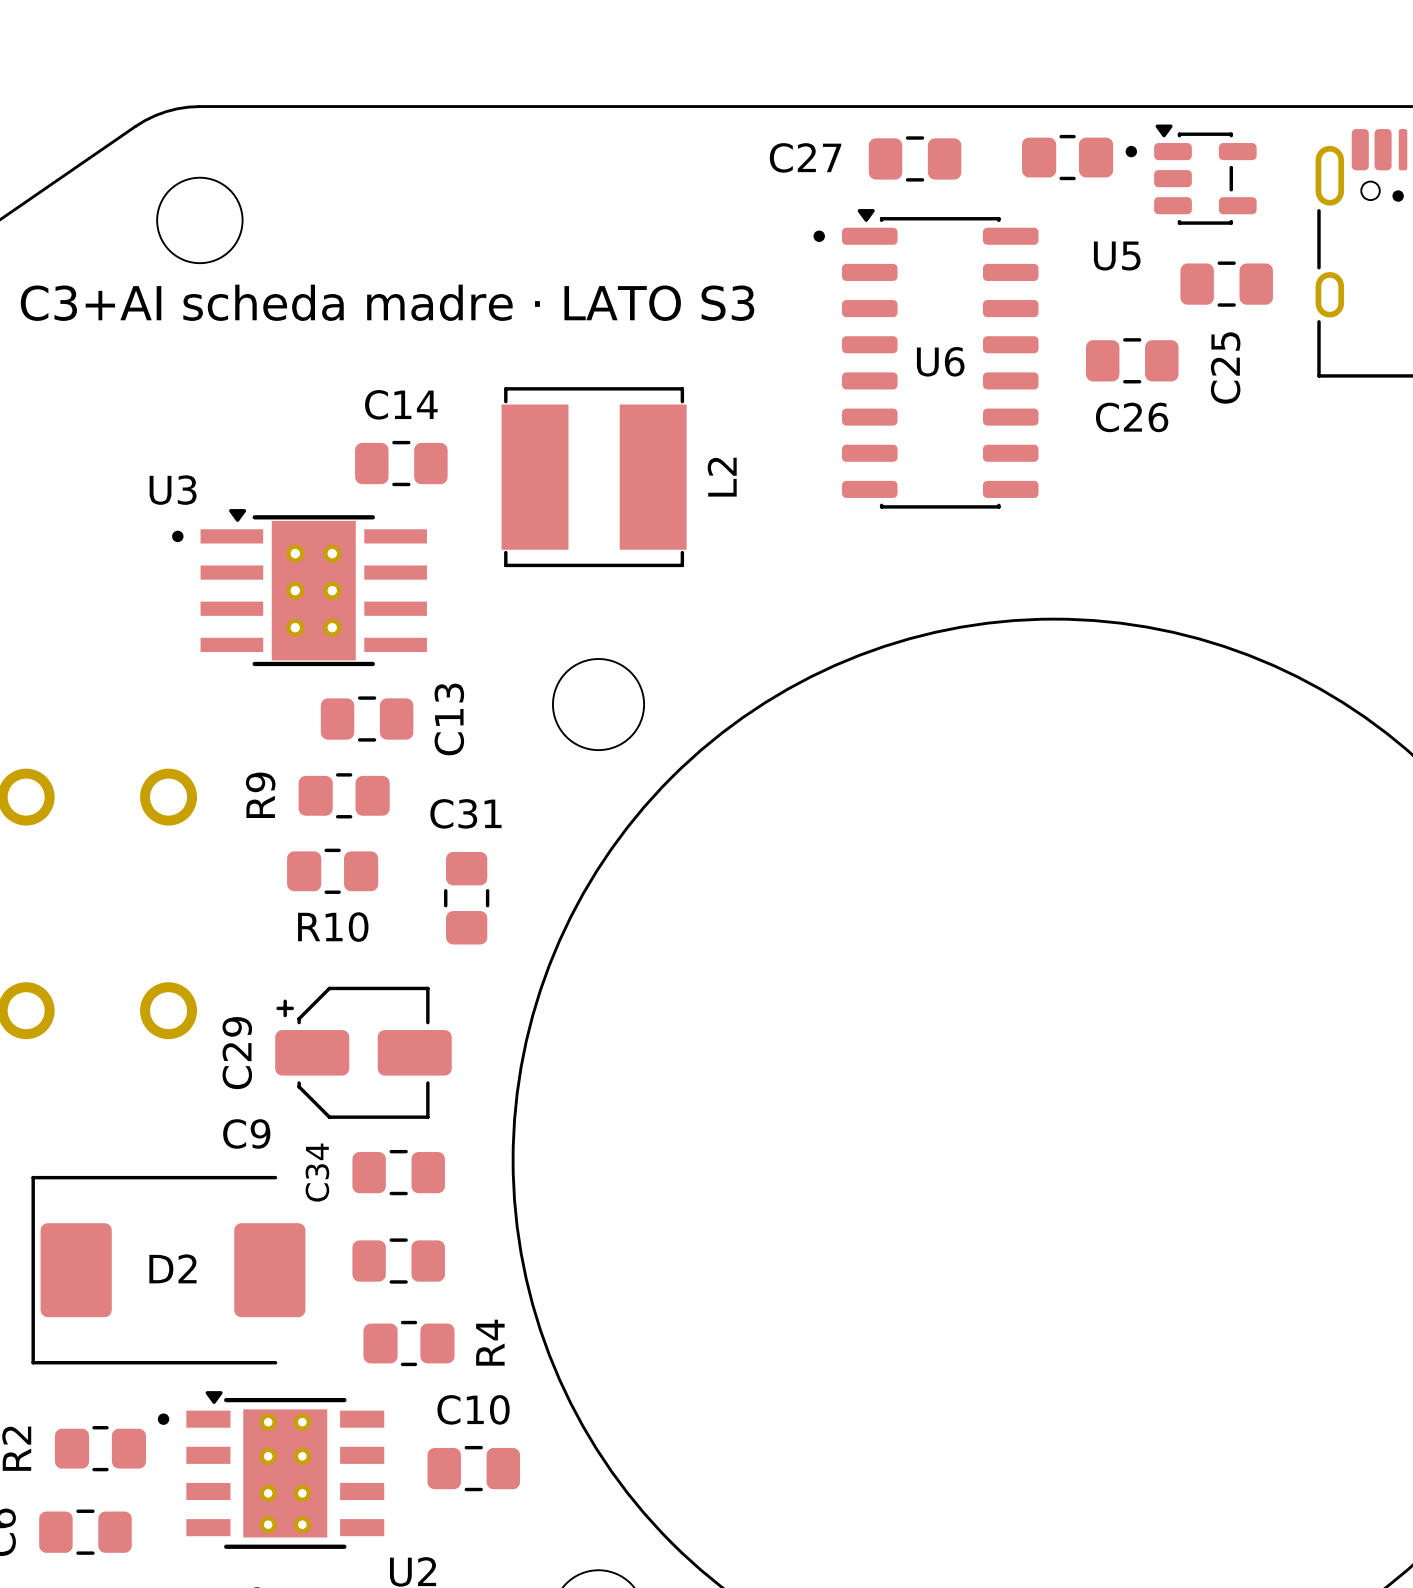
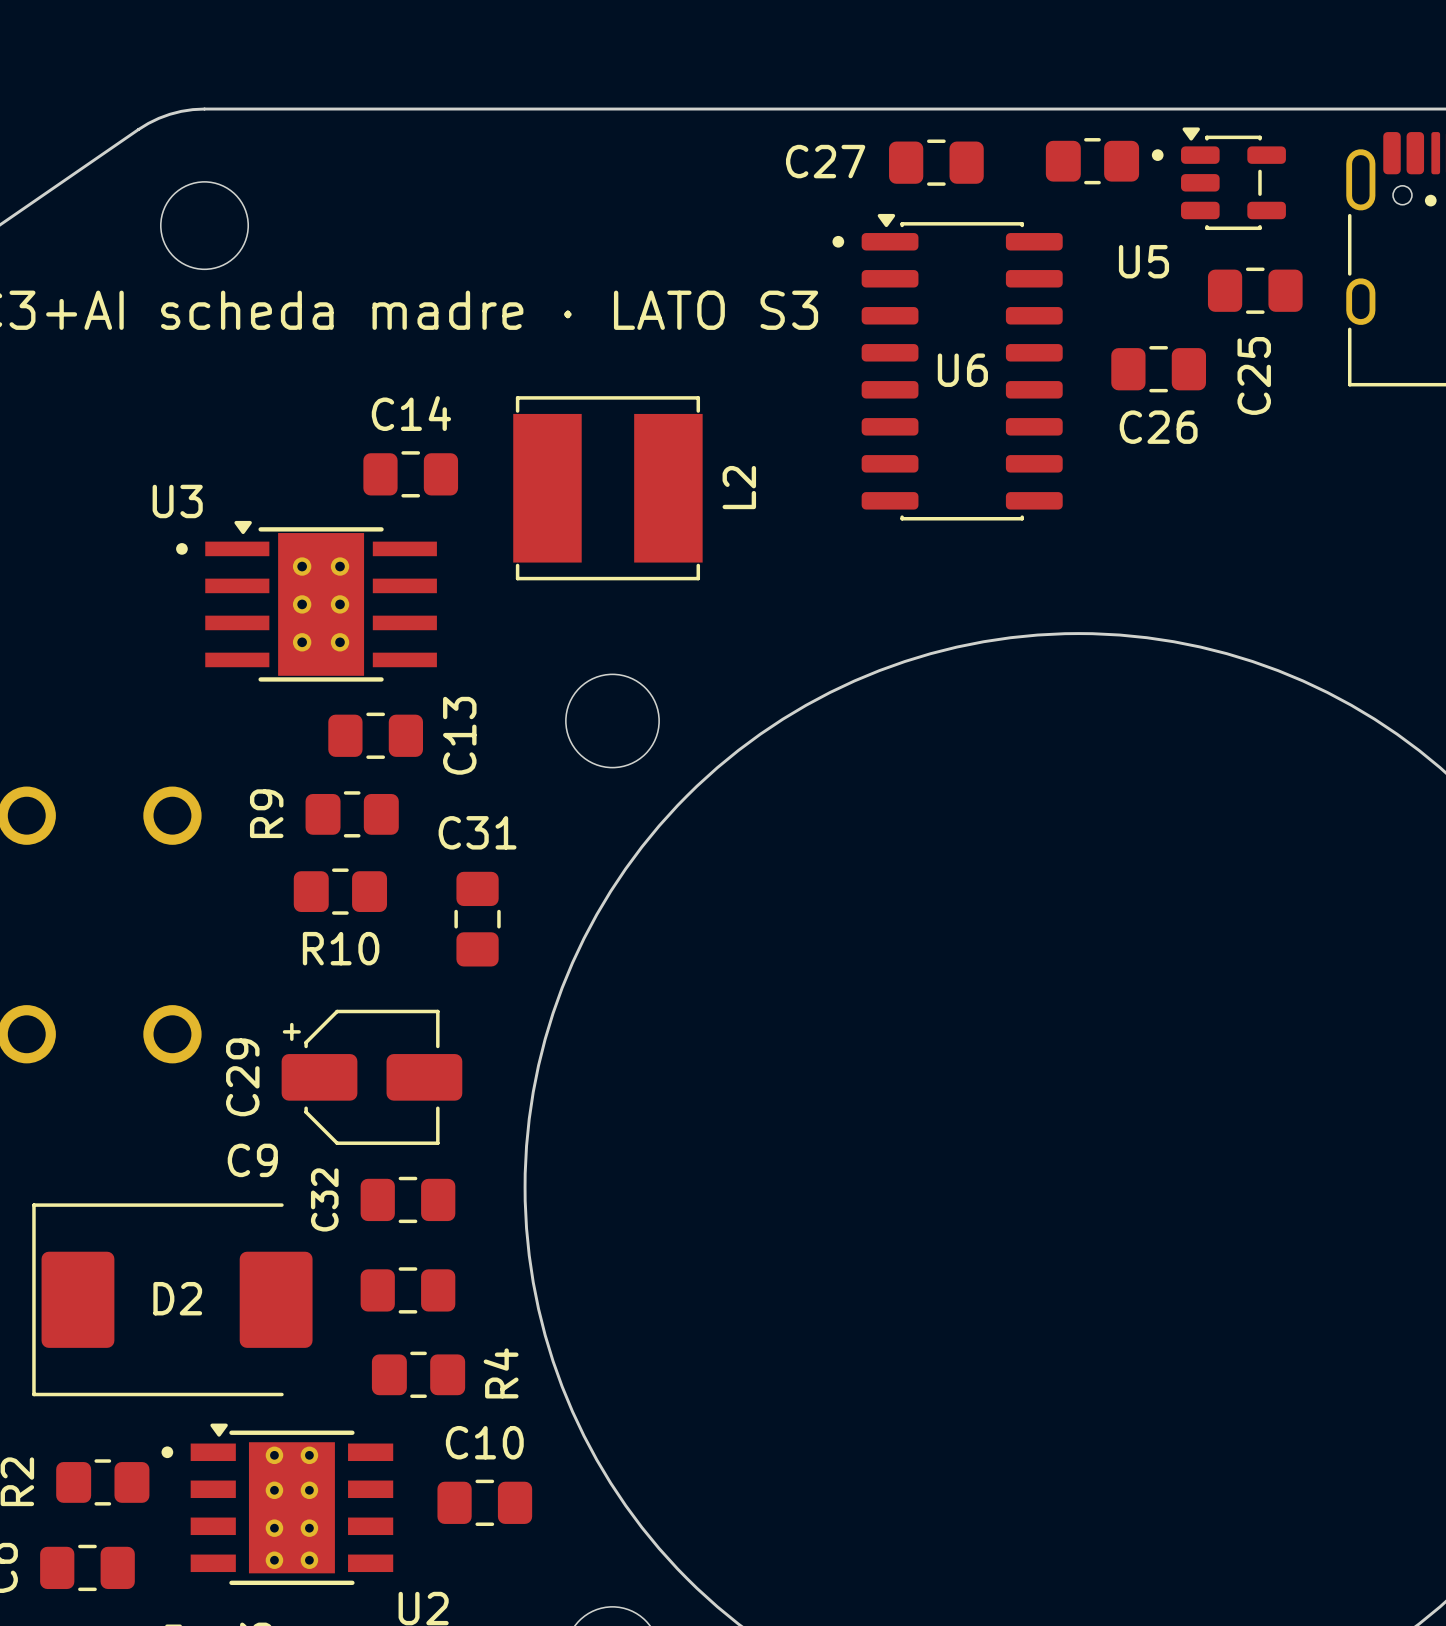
C34 name: C34 (317, 1172) -> C32 (324, 1199)

